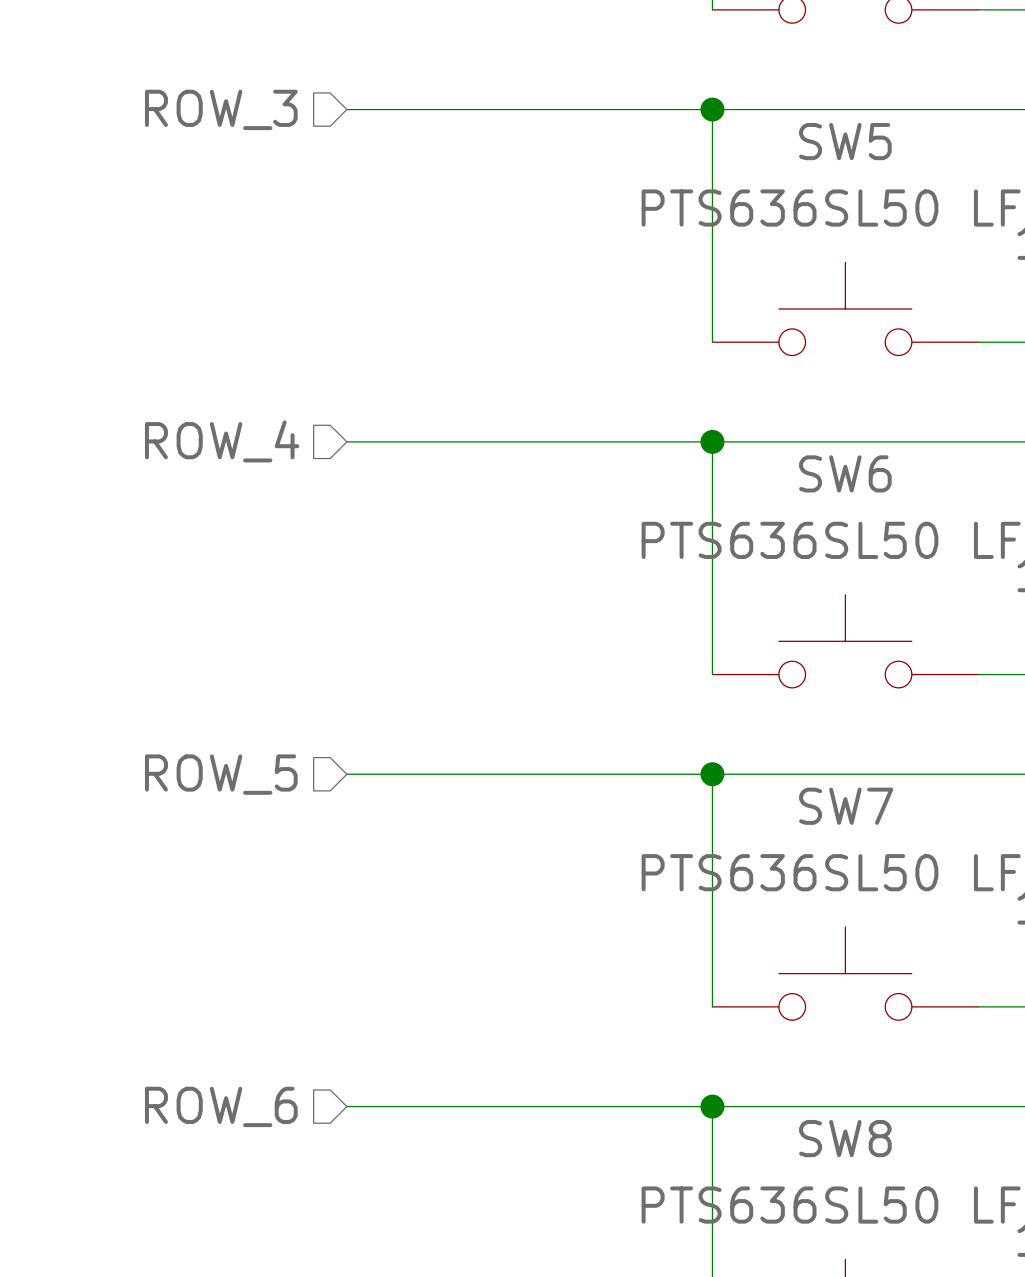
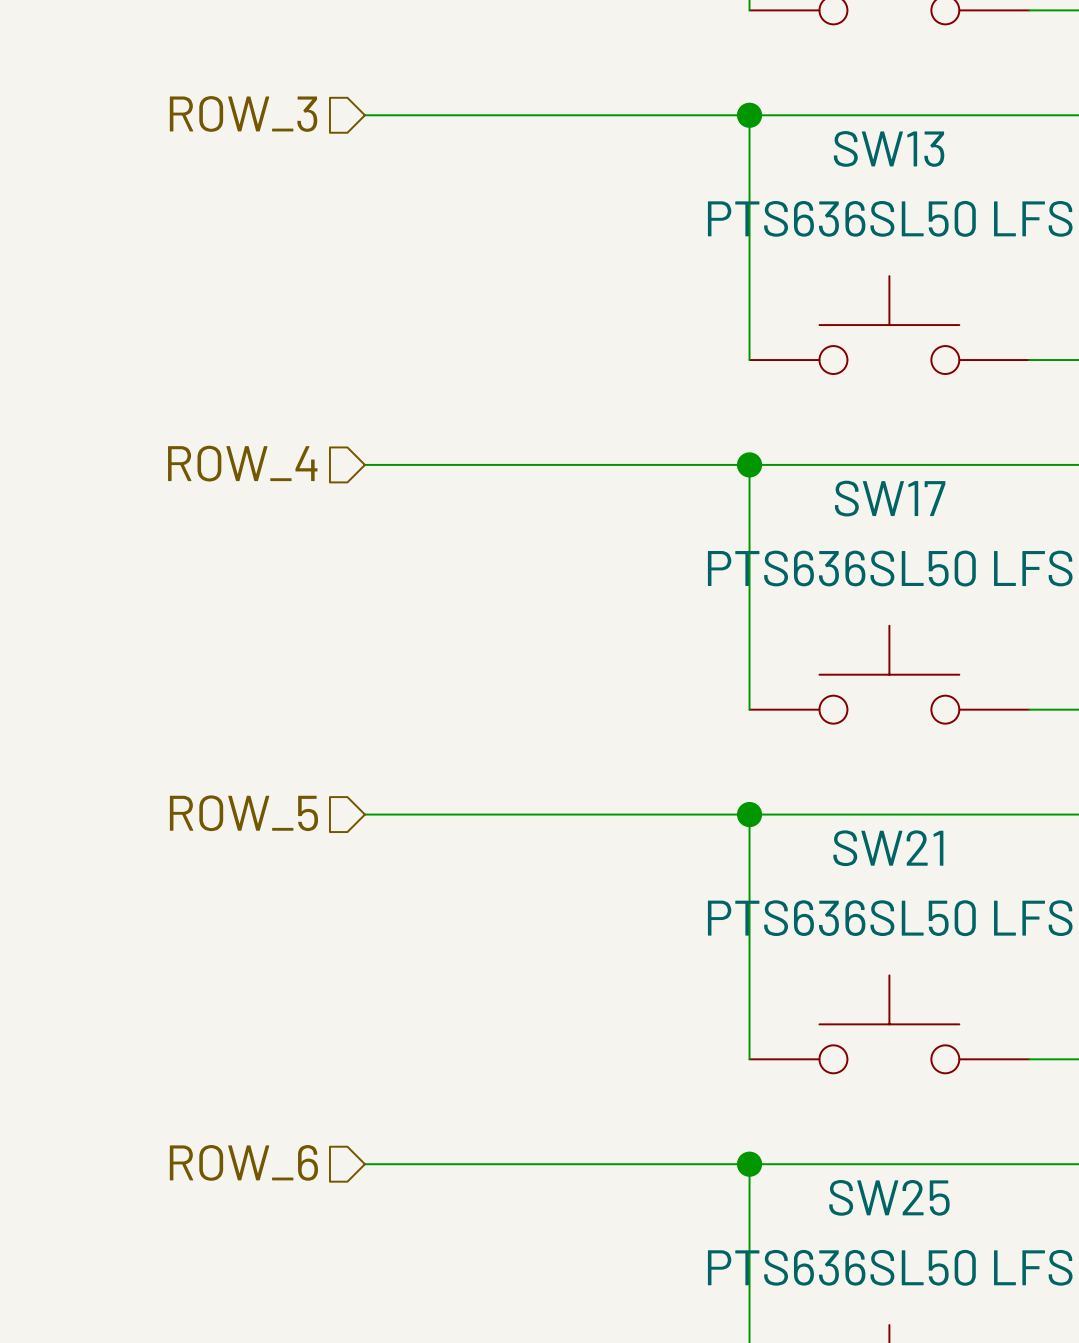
SW5 name: SW5 (845, 141) -> SW13 (889, 148)
SW6 name: SW6 (845, 473) -> SW17 (890, 498)
SW7 name: SW7 (846, 806) -> SW21 (888, 848)
SW8 name: SW8 (845, 1138) -> SW25 (889, 1197)

